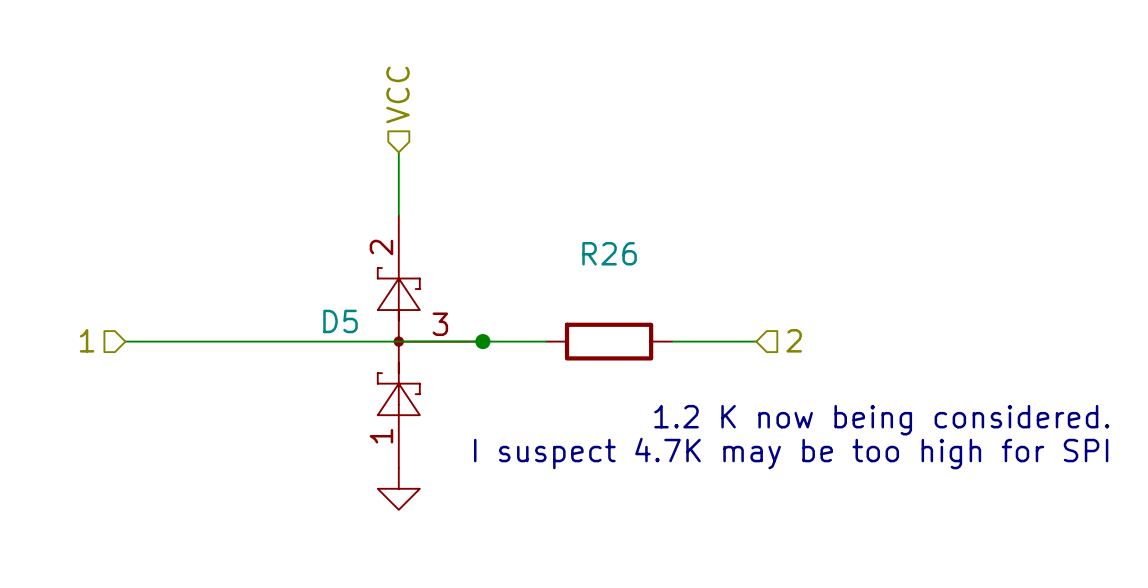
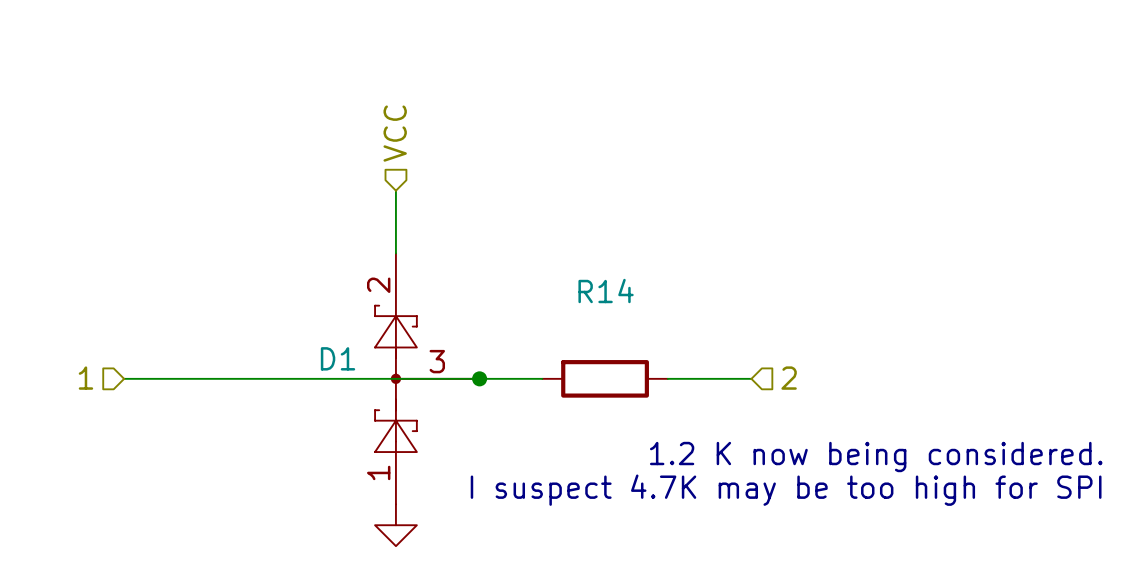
R26 name: R26 (609, 253) -> R14 (606, 291)
D5 name: D5 (340, 321) -> D1 (338, 358)

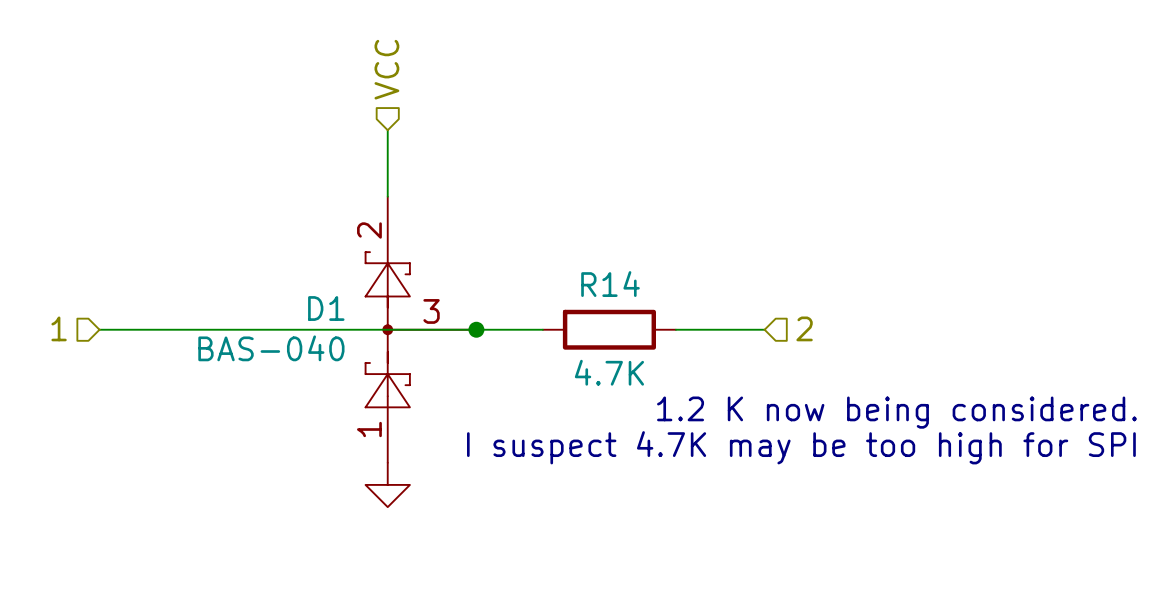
R14 name position: R14 (606, 291) -> R14 (610, 284)
D1 value: none -> BAS-040 (271, 348)
R14 value: none -> 4.7K (609, 372)

